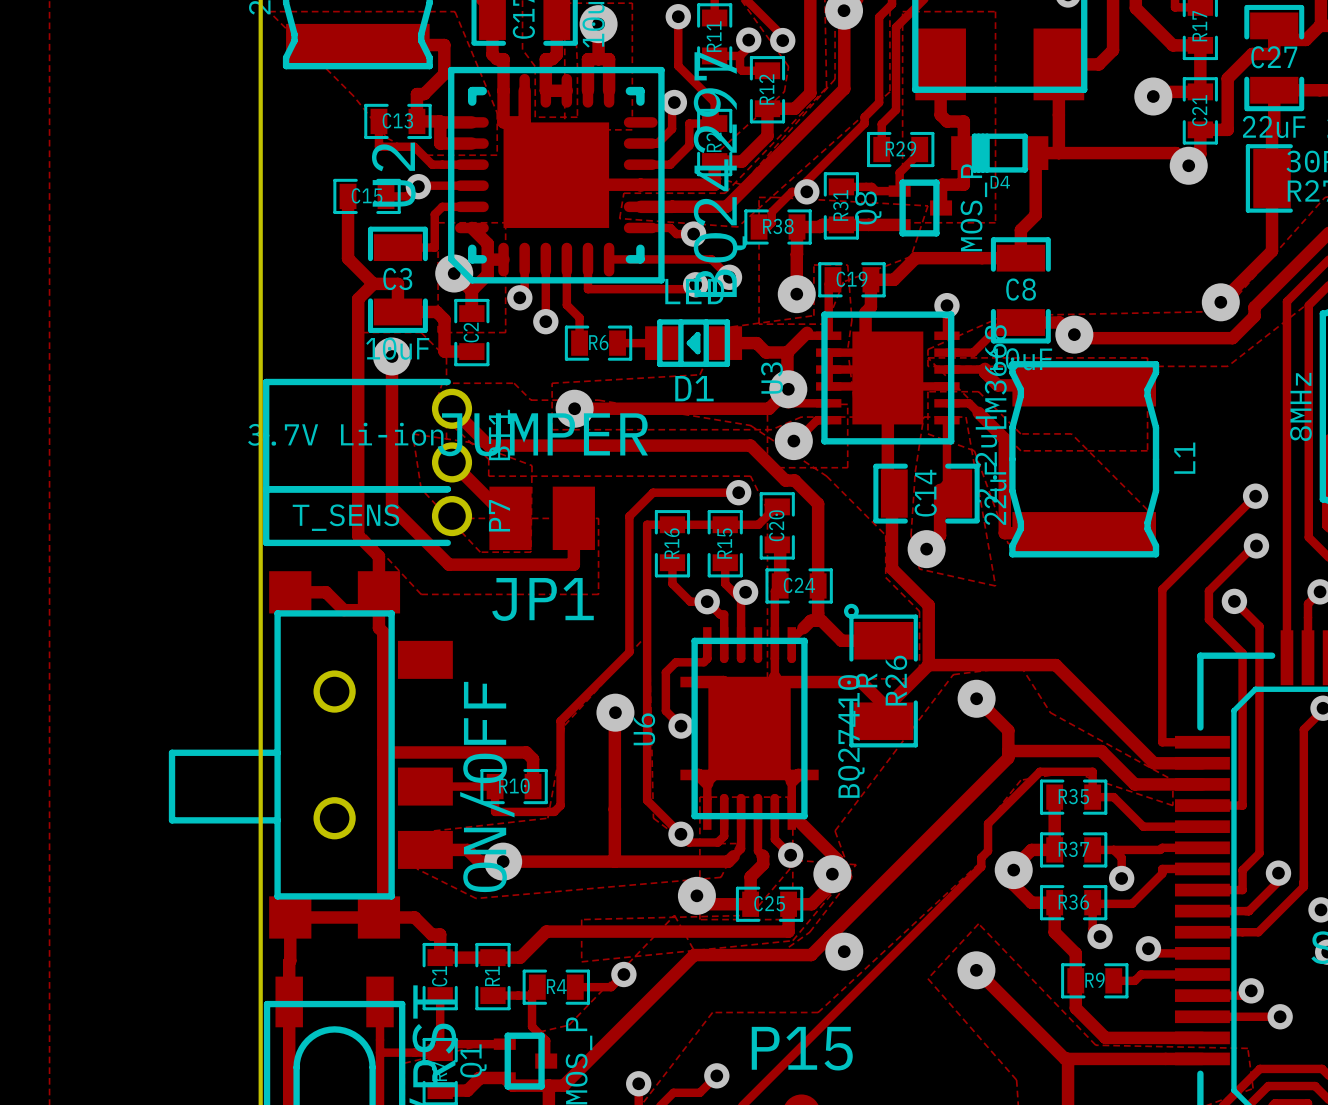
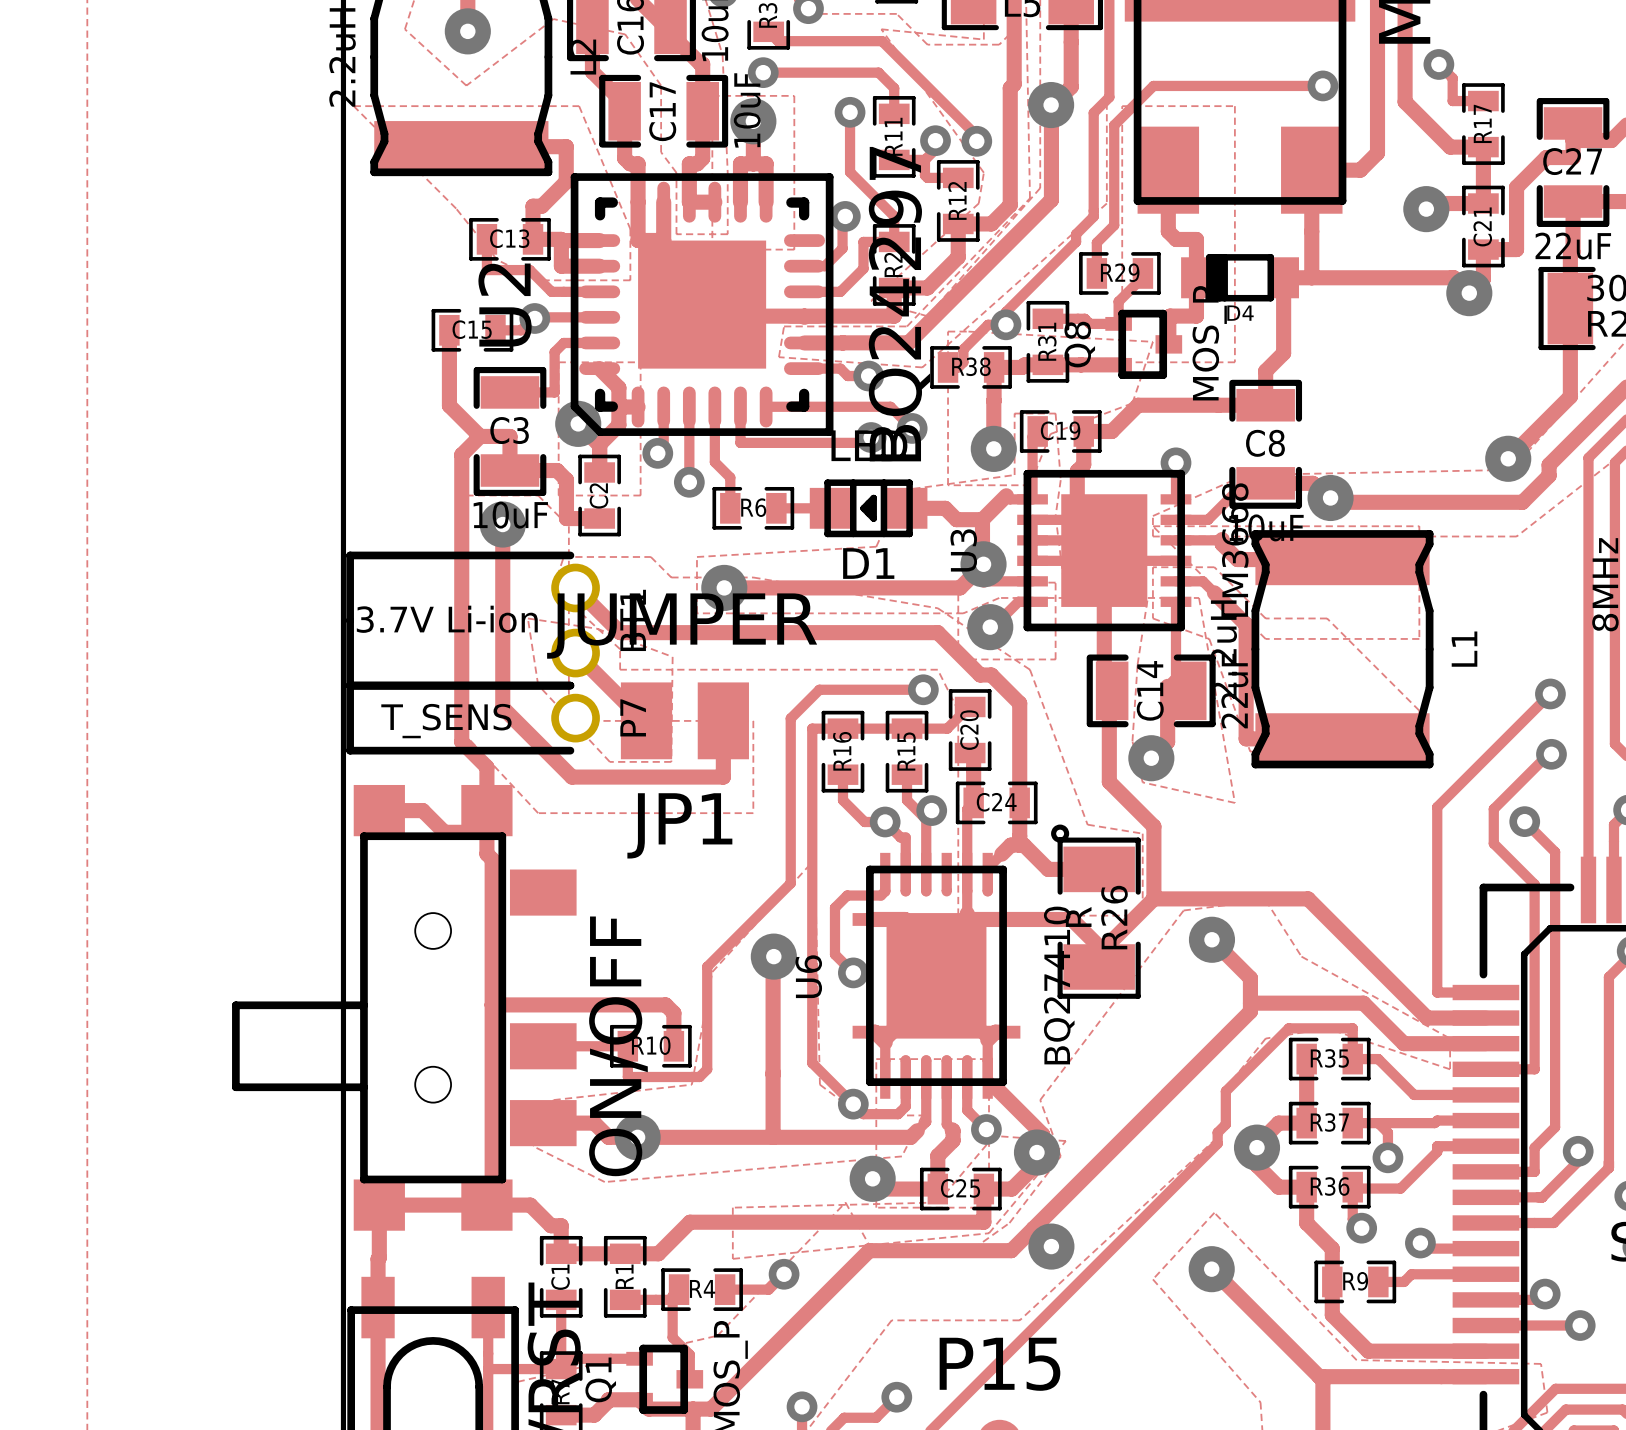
zone outline: (826, 476) (885, 535) (885, 577) (919, 611) -> (1029, 669) (1087, 824) (1142, 833)
part footprint: [168, 571, 453, 939] -> [232, 784, 577, 1231]

